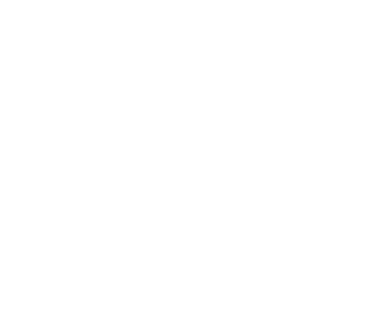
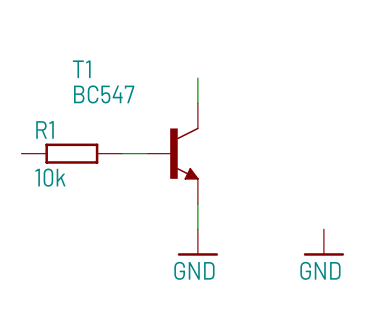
wire: none -> (197, 78) (197, 103)
R1: none -> 10k (71, 153)
wire: none -> (122, 153) (147, 153)
T1: none -> BC547 (173, 153)
wire: none -> (197, 204) (197, 229)
power symbol: none -> GND (197, 242)
power symbol: none -> GND (323, 242)

